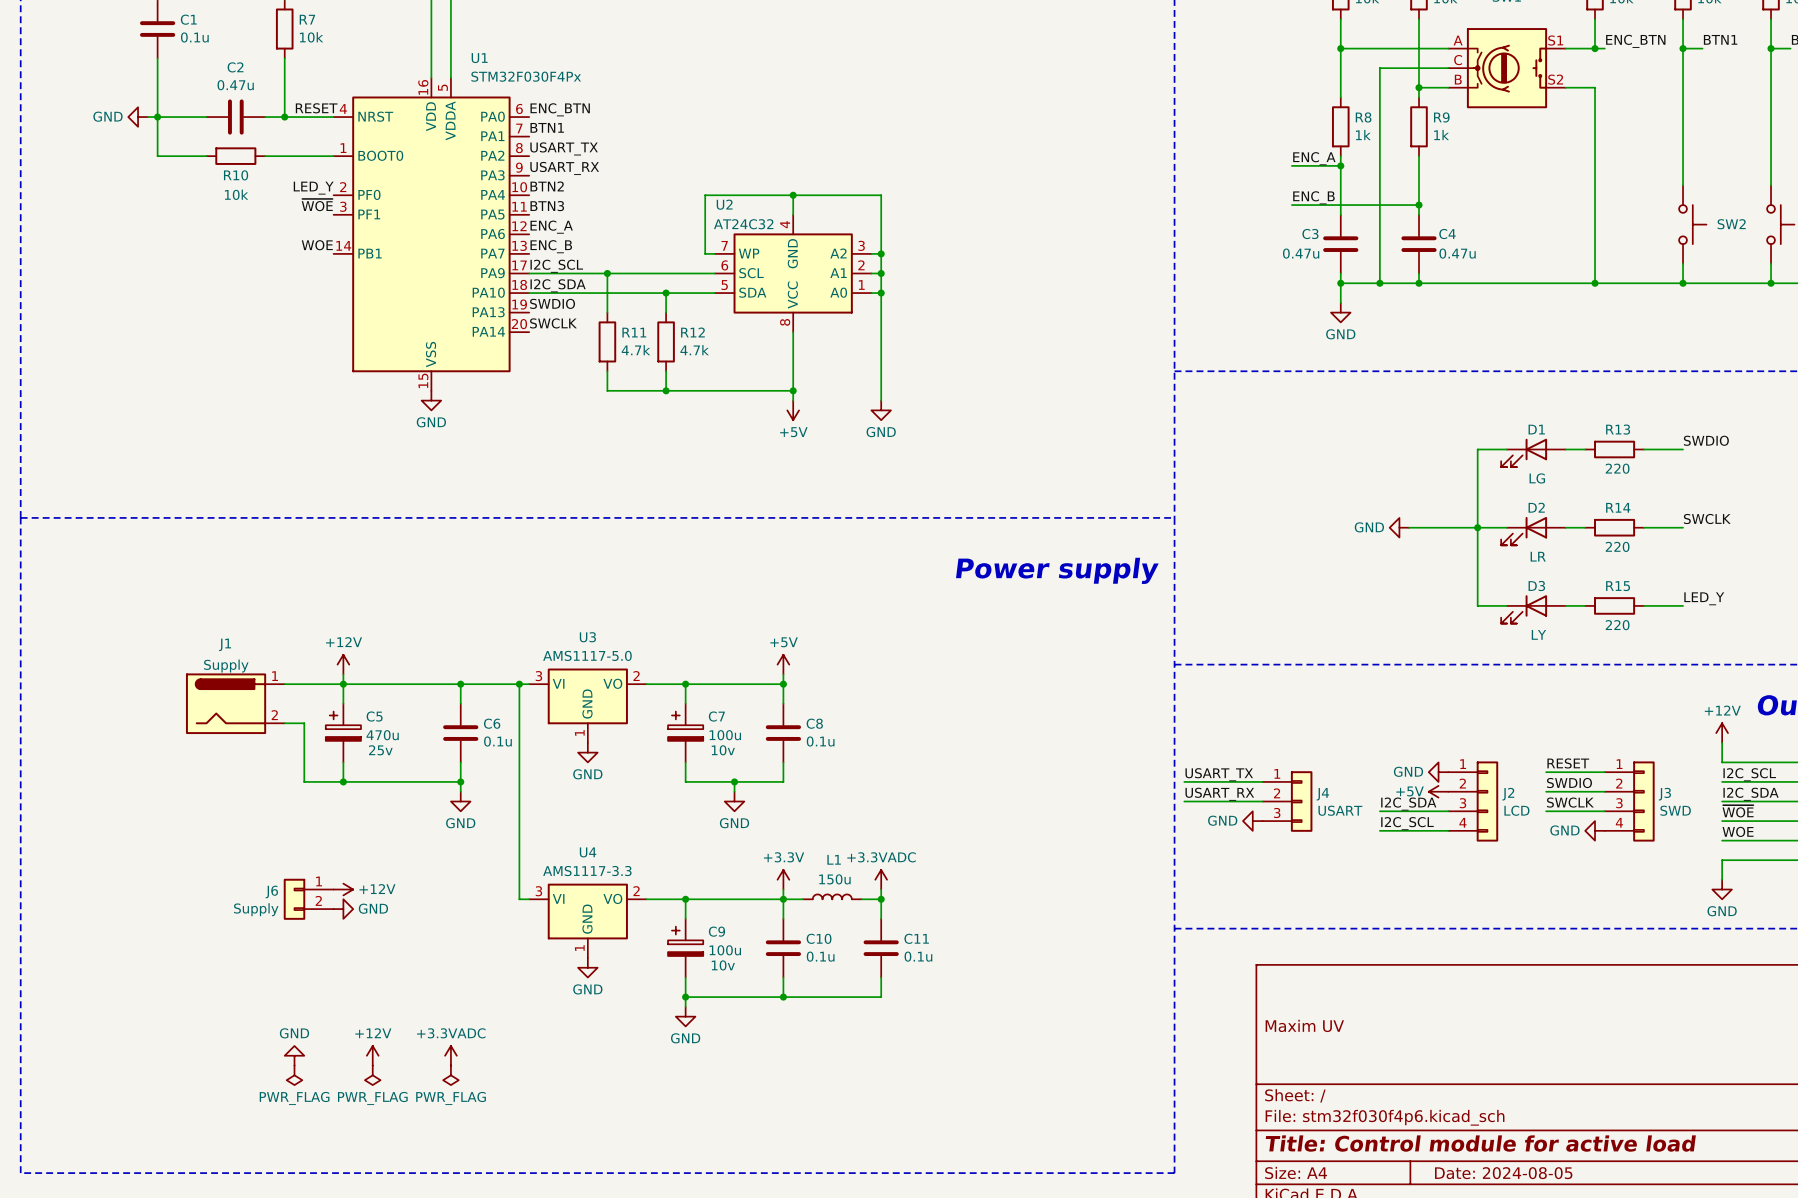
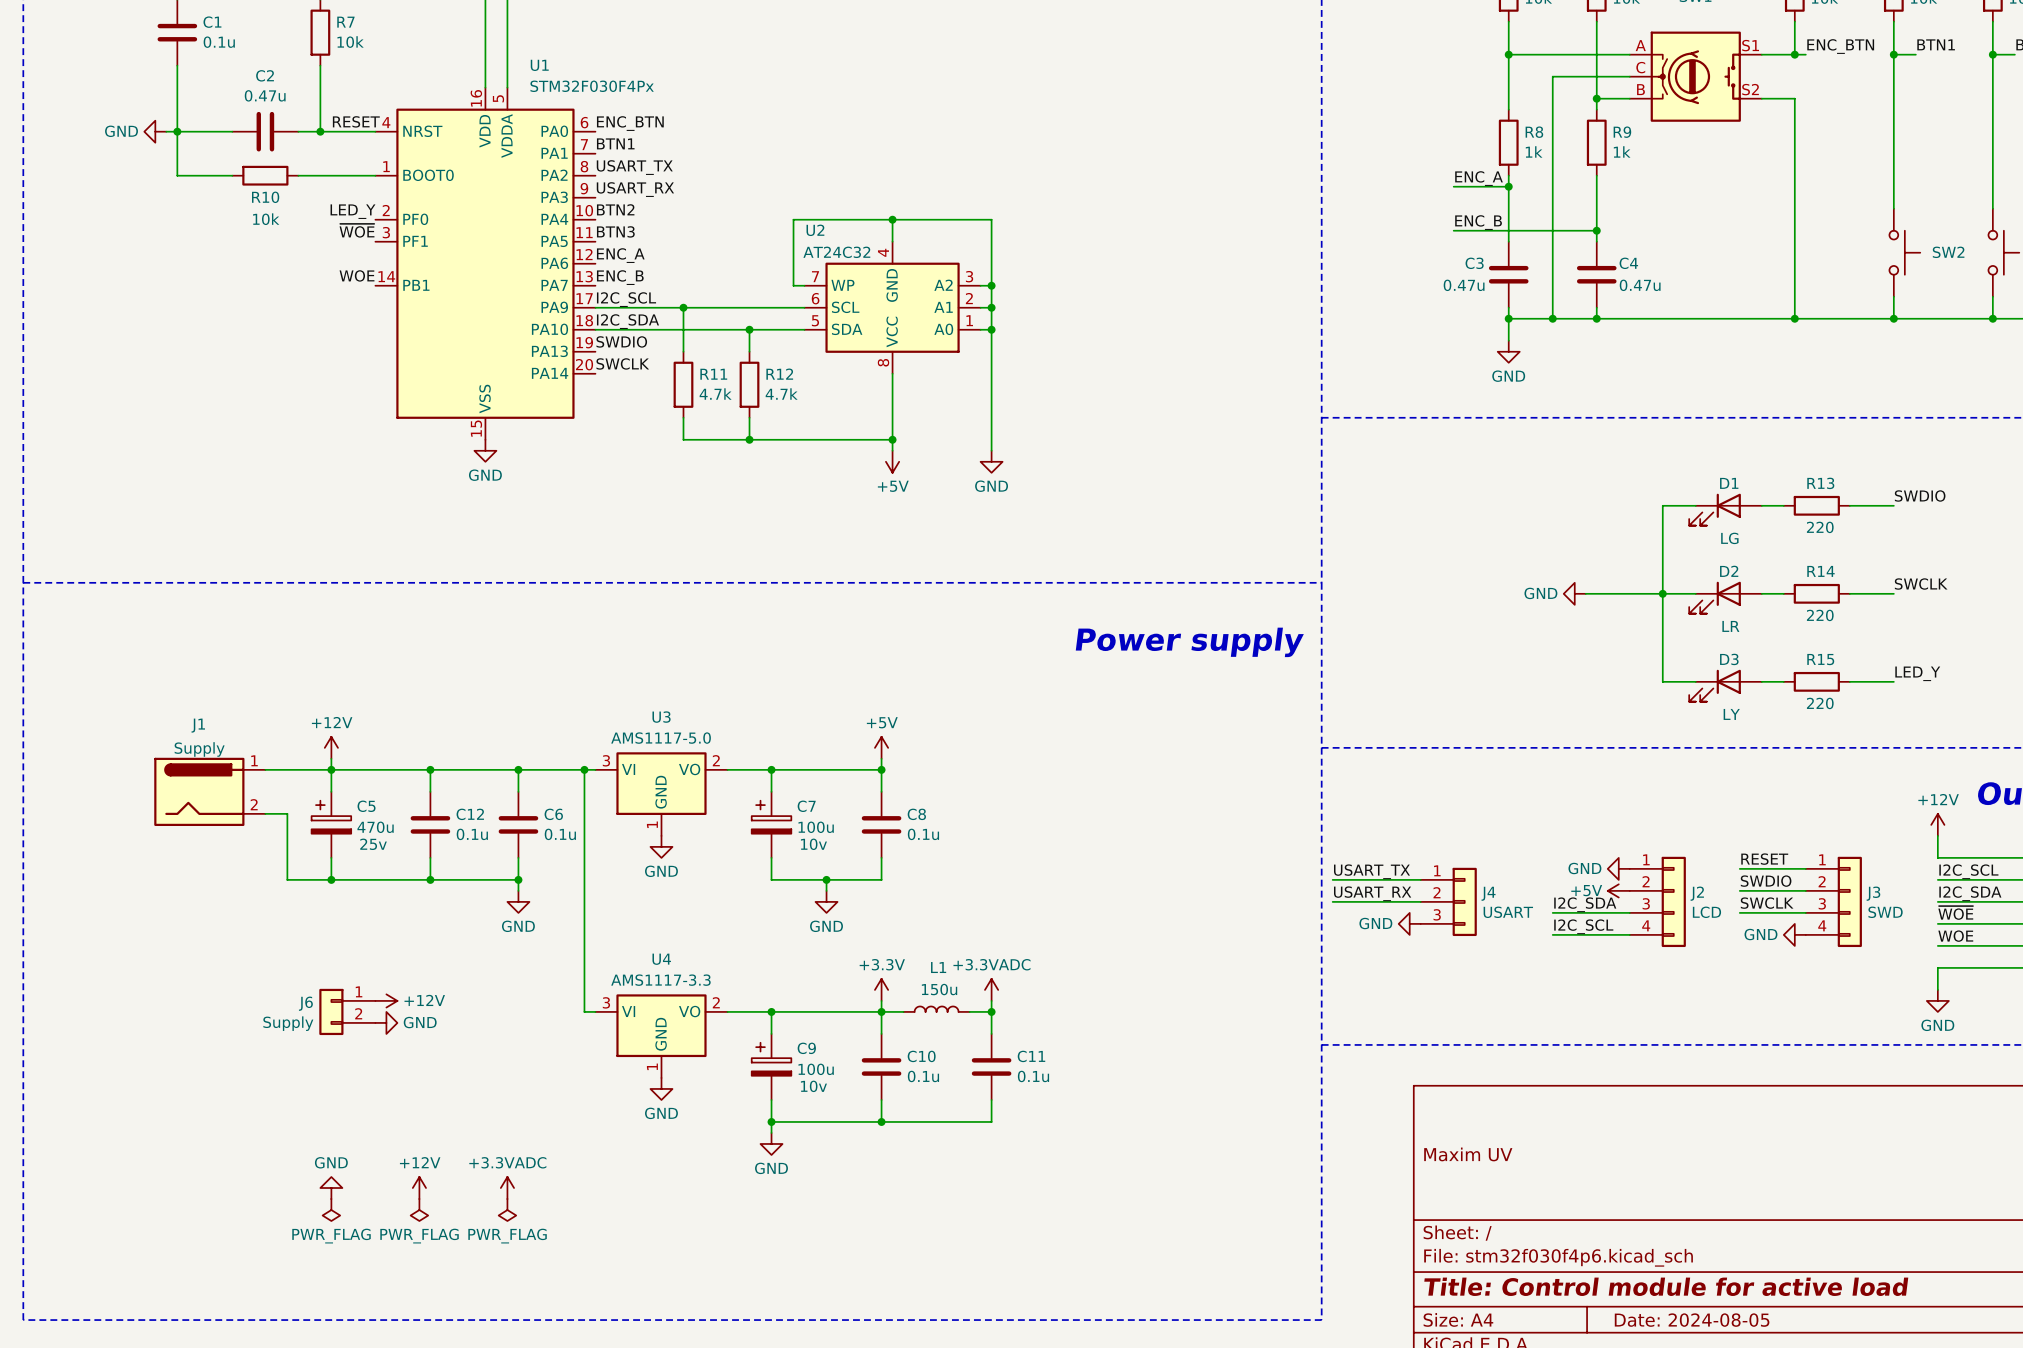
power symbol position: +12V (343, 664) -> +12V (331, 747)
wire: (343, 674) (343, 703) -> (331, 758) (331, 791)
junction: none -> (331, 769)
junction: (343, 684) -> none
wire: none -> (430, 769) (430, 791)
junction: none -> (430, 769)
J1 position: (235, 703) -> (209, 791)
wire: (284, 723) (304, 723) (304, 781) -> (265, 813) (287, 813) (287, 879) (342, 879)
C5 position: (343, 733) -> (331, 824)
C12: none -> 0.1u (430, 824)
wire: (343, 762) (343, 781) -> (331, 857) (331, 879)
wire: none -> (430, 857) (430, 879)
junction: none -> (331, 879)
junction: (343, 781) -> none
junction: none -> (430, 879)

